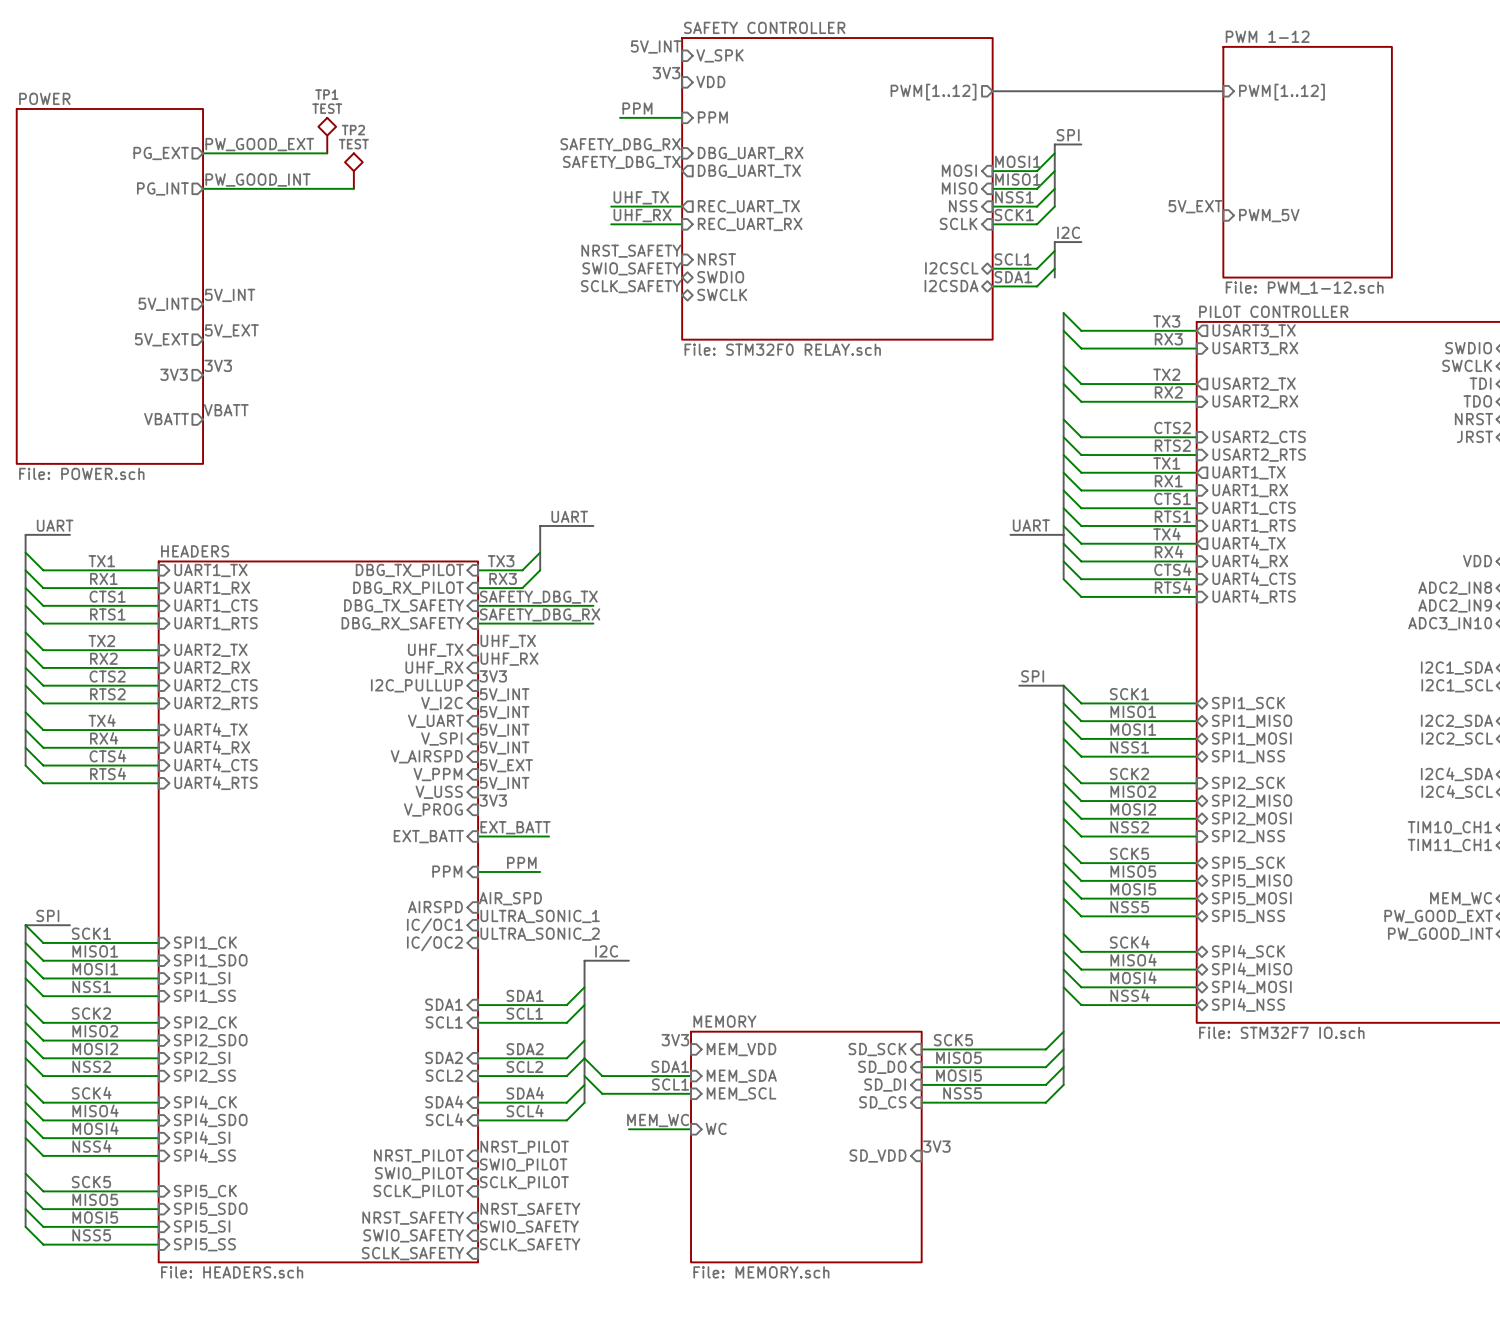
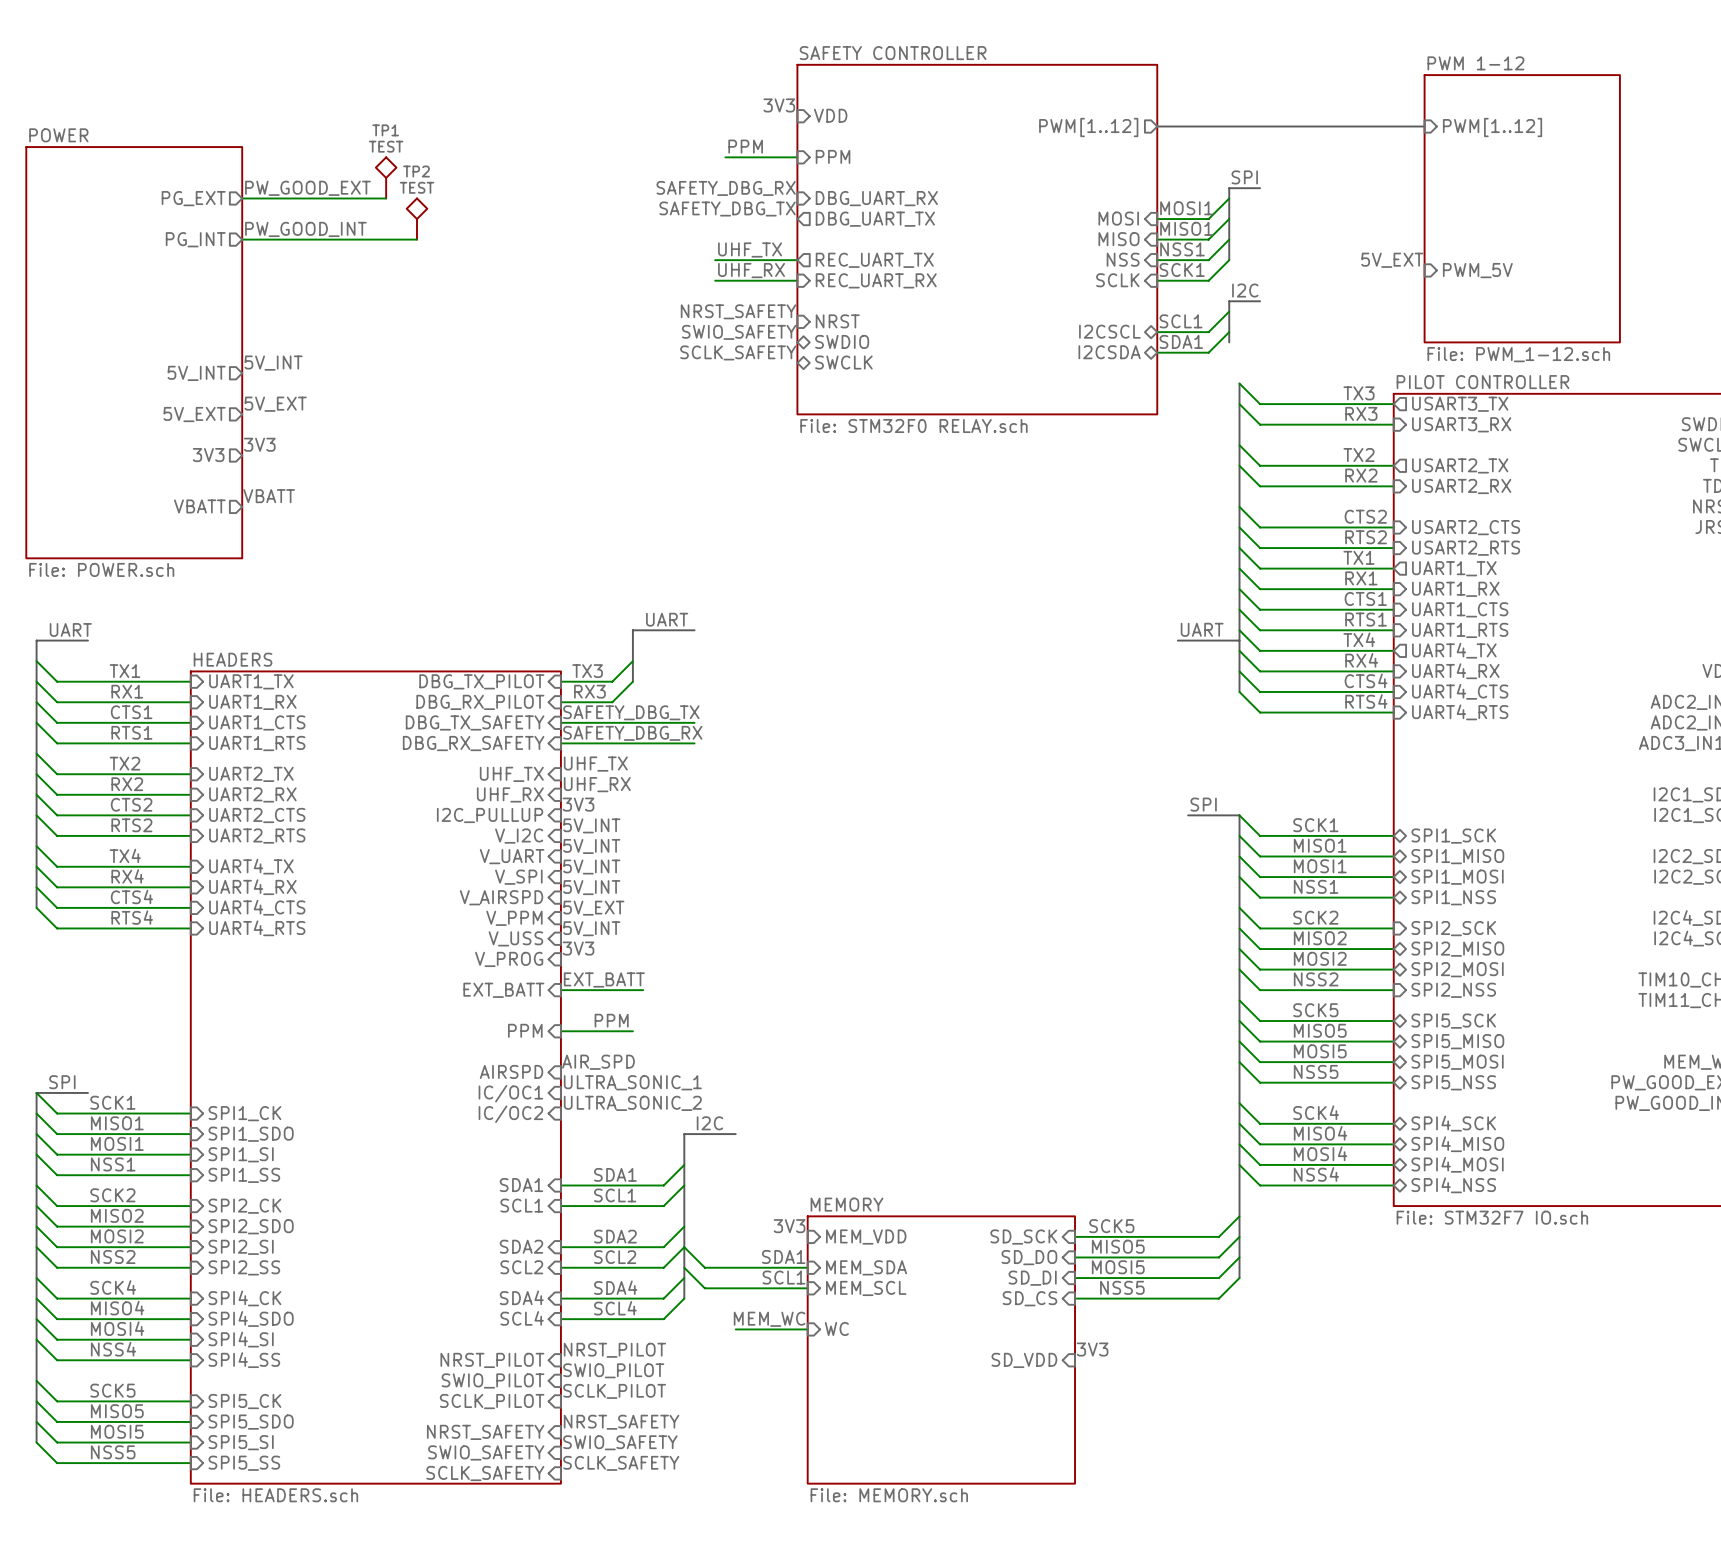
label: 5V_INT (656, 46) -> none
sheet pin: V_SPK (719, 55) -> none

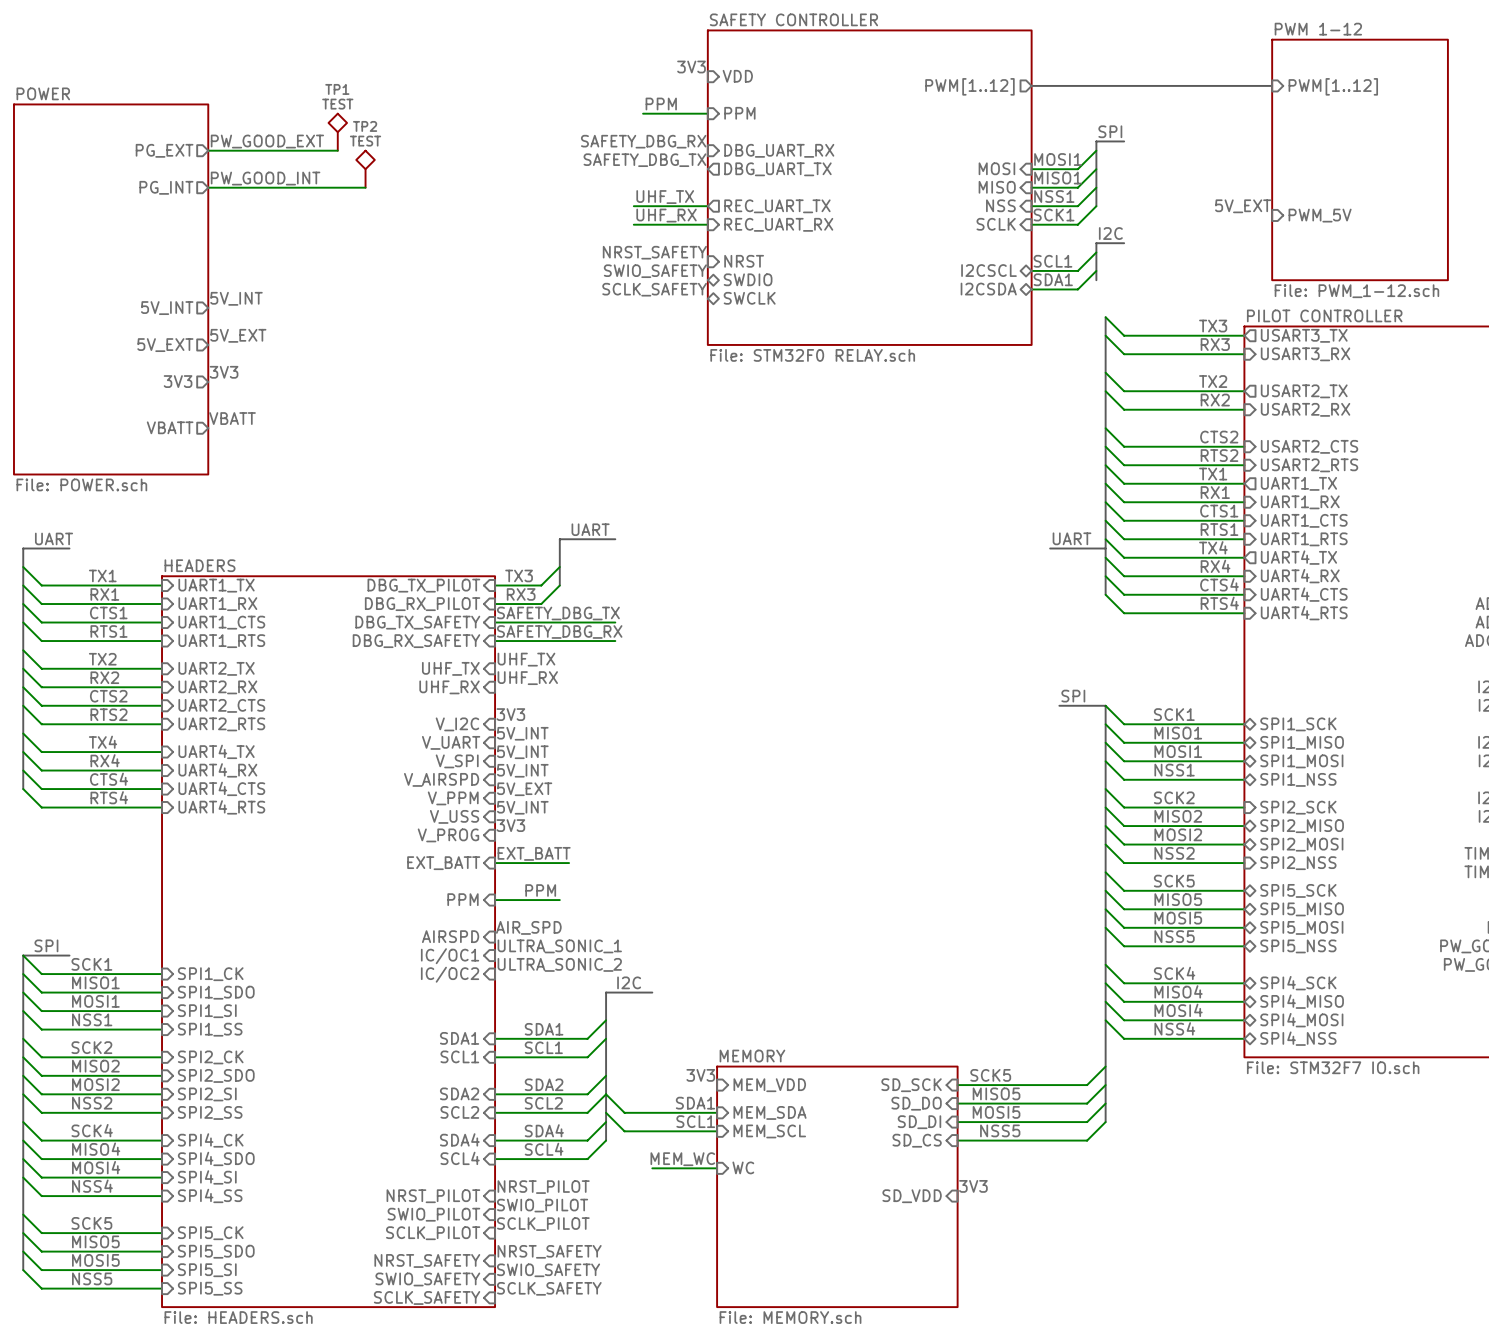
label: 3V3 (578, 804) -> none
sheet pin: I2C_PULLUP (490, 815) -> none
label: 5V_INT (591, 825) -> 3V3 (510, 714)

